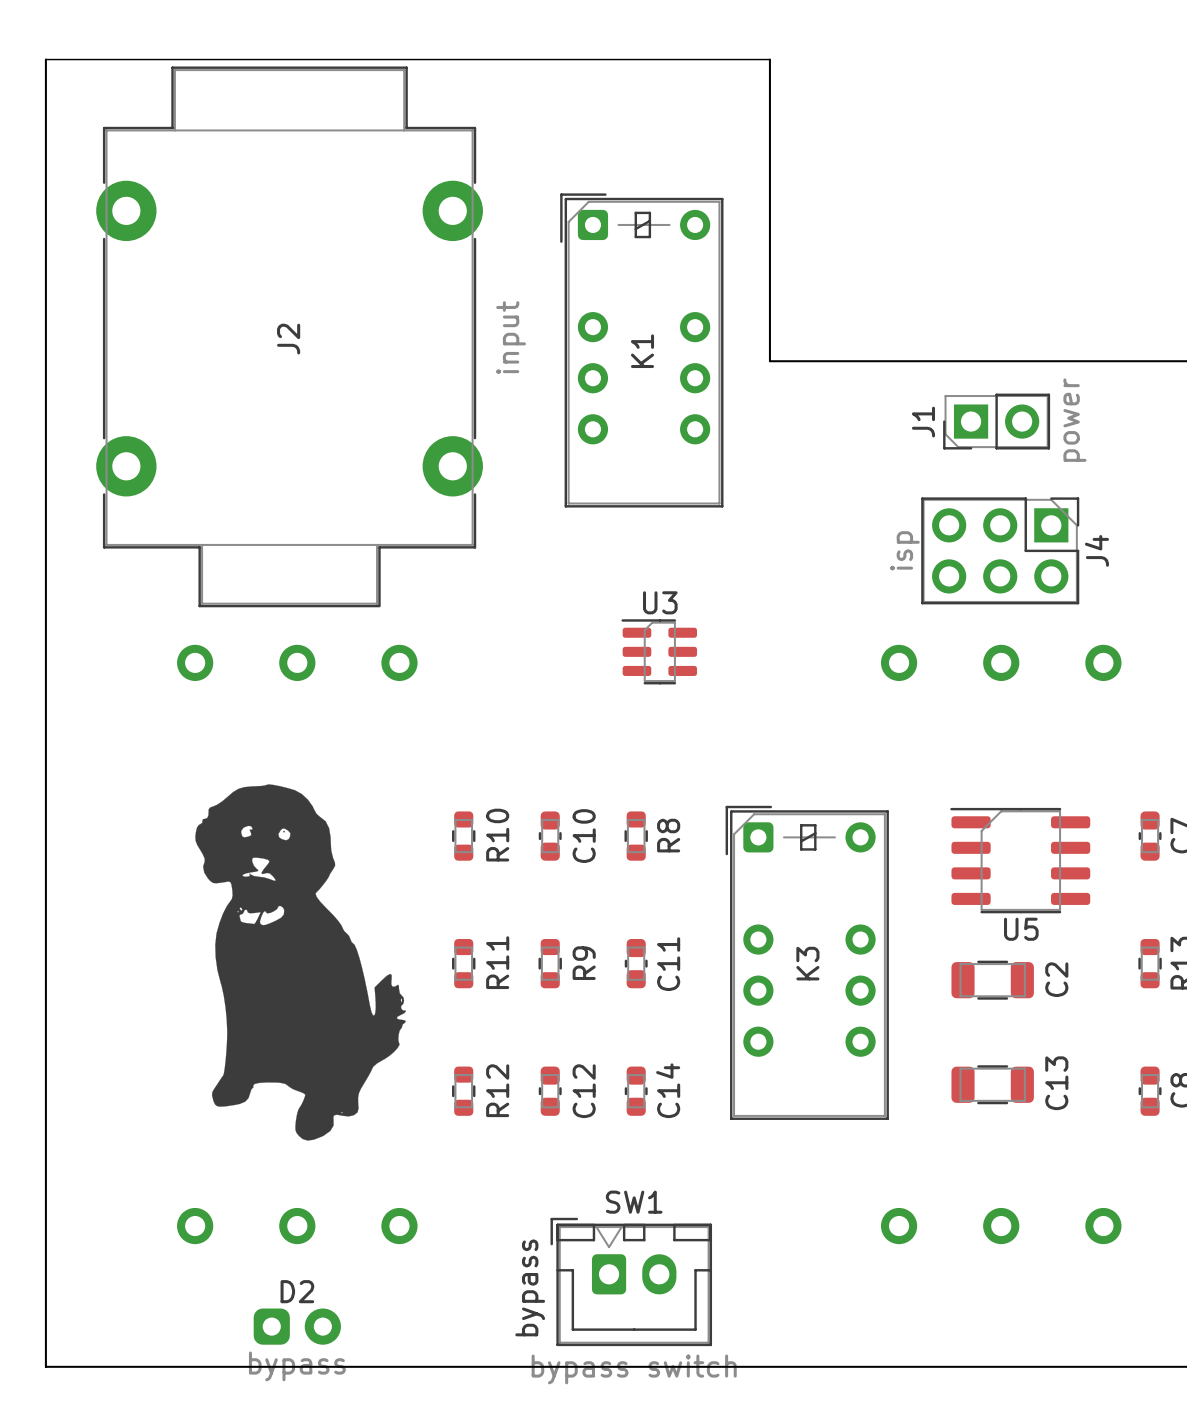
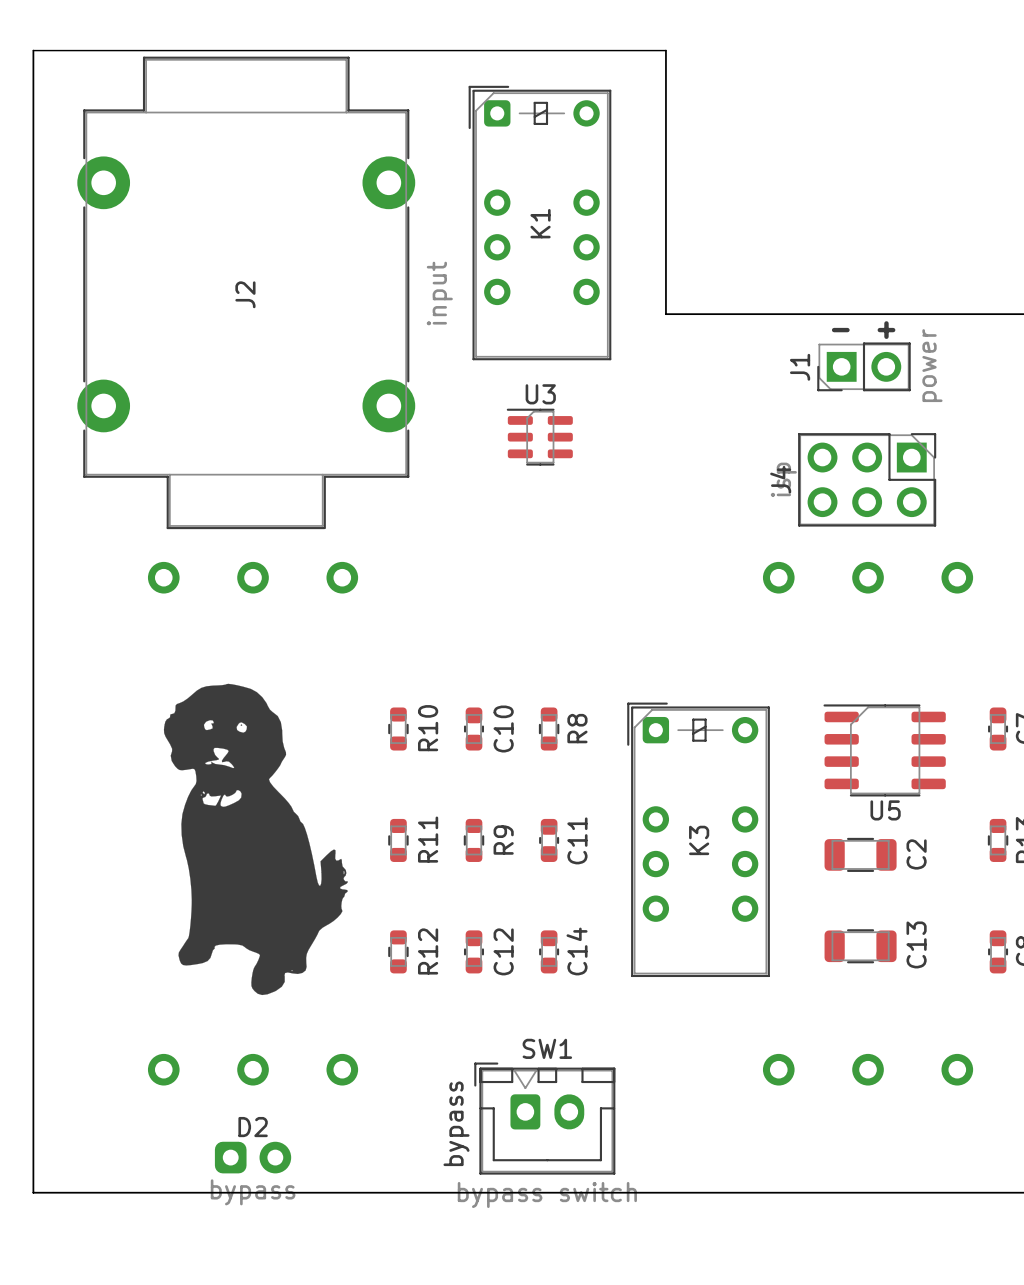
K1 position: (641, 350) -> (539, 223)
text: none -> - (840, 330)
text: none -> + (886, 330)
J4 name position: J4 (1096, 550) -> J4 (780, 479)
U3 position: (659, 651) -> (539, 437)

